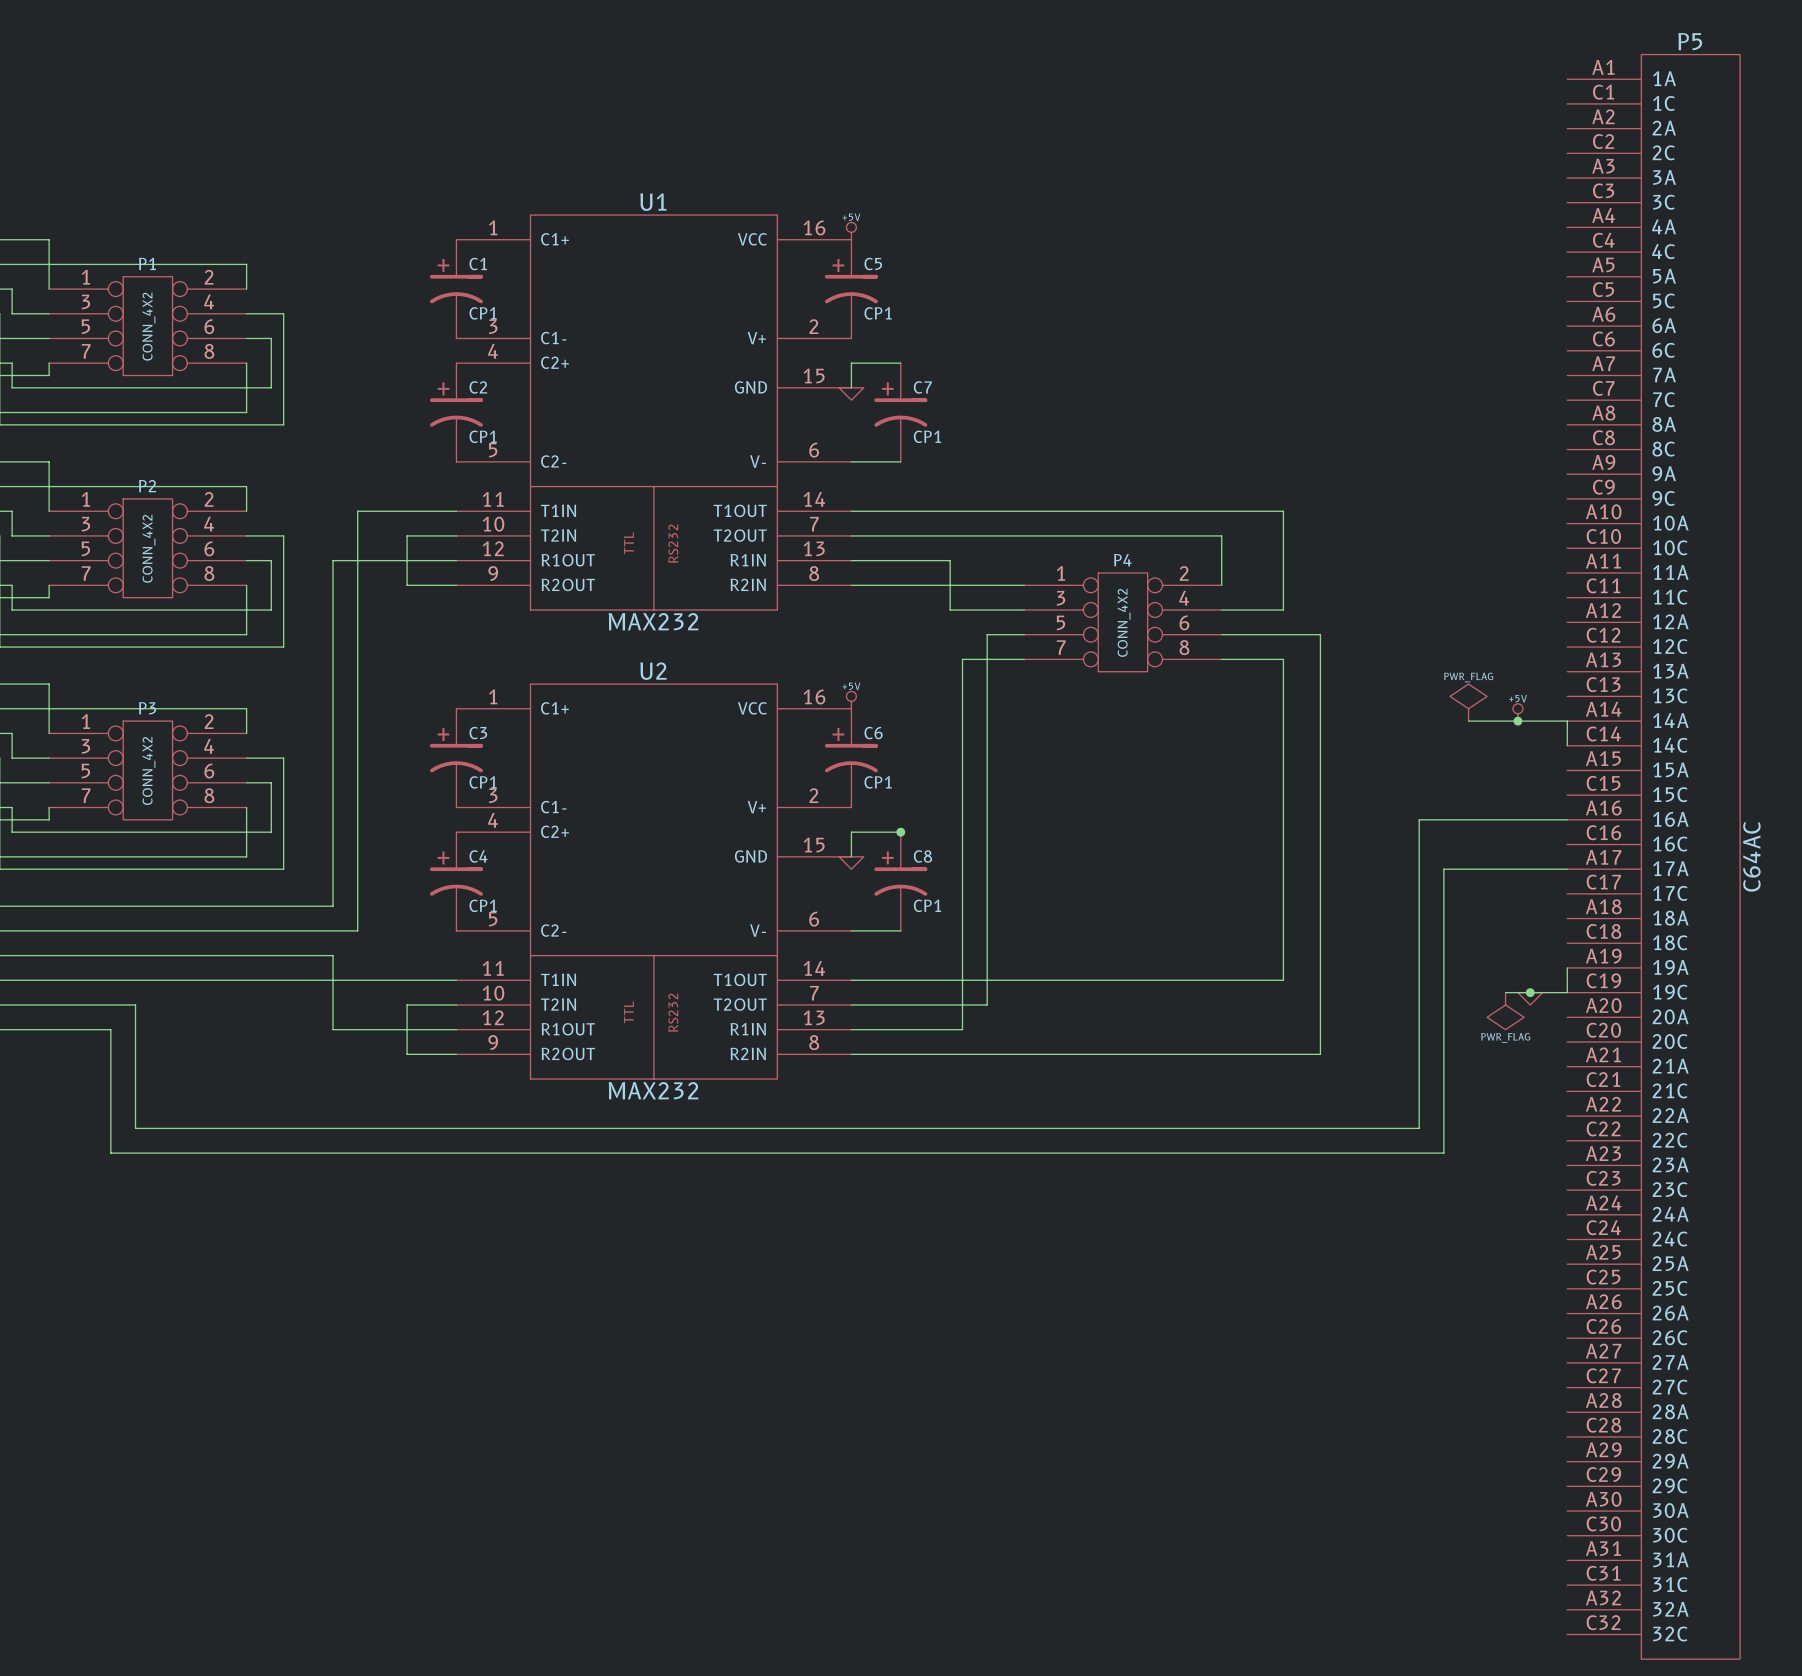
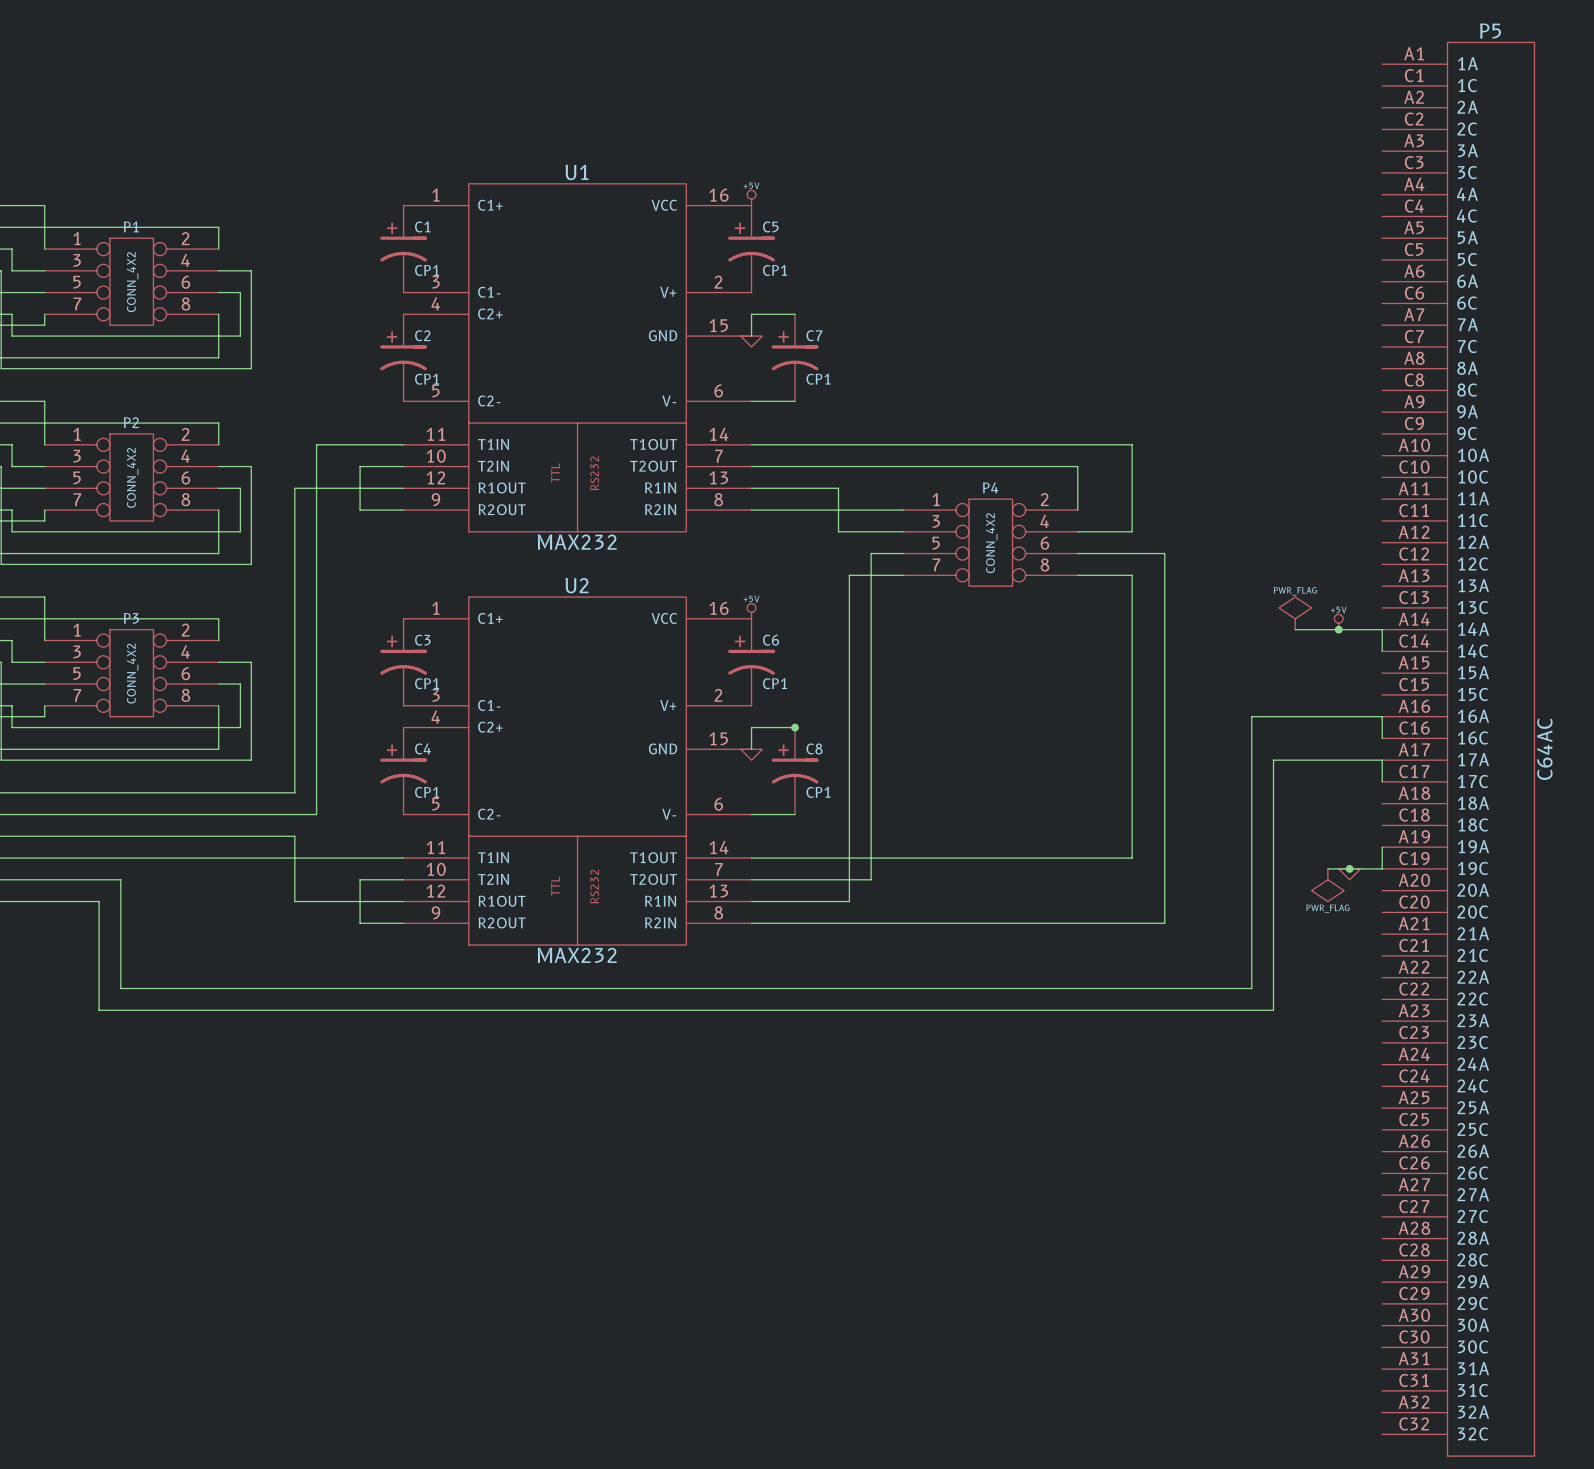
wire: none -> (1382, 716) (1382, 738)
wire: none -> (1382, 760) (1382, 781)

